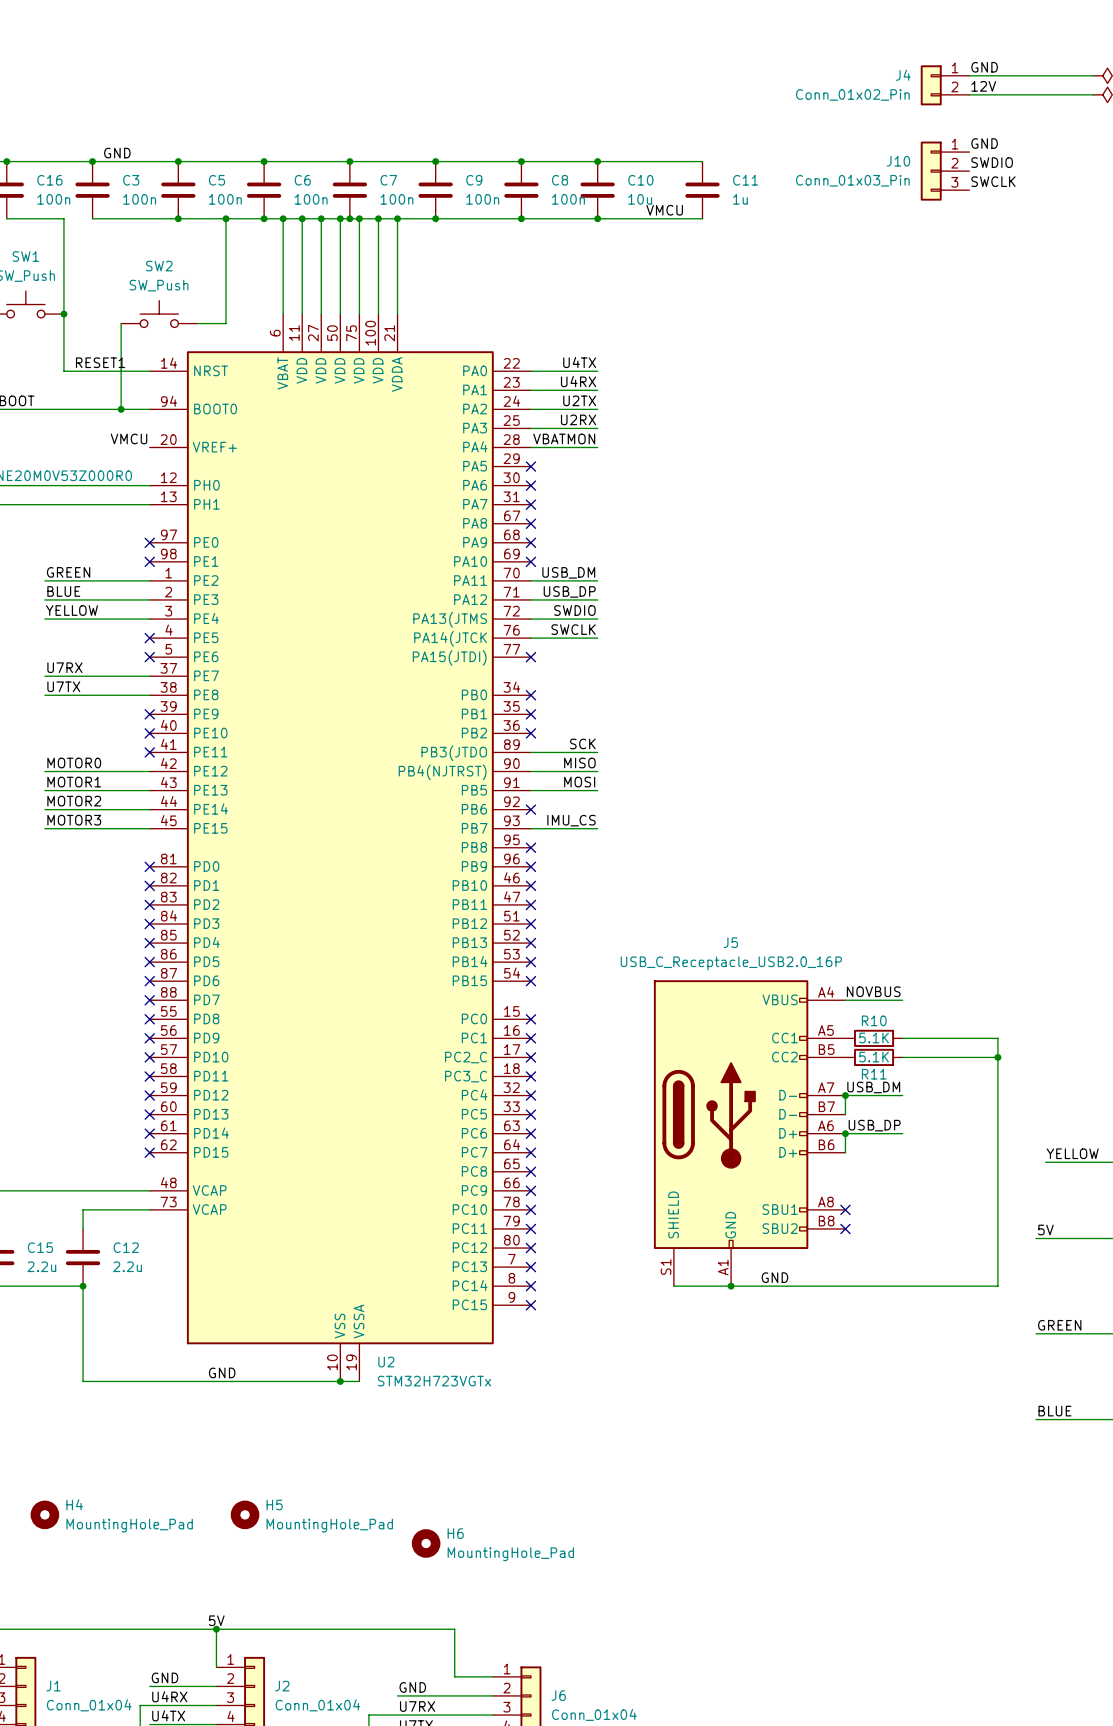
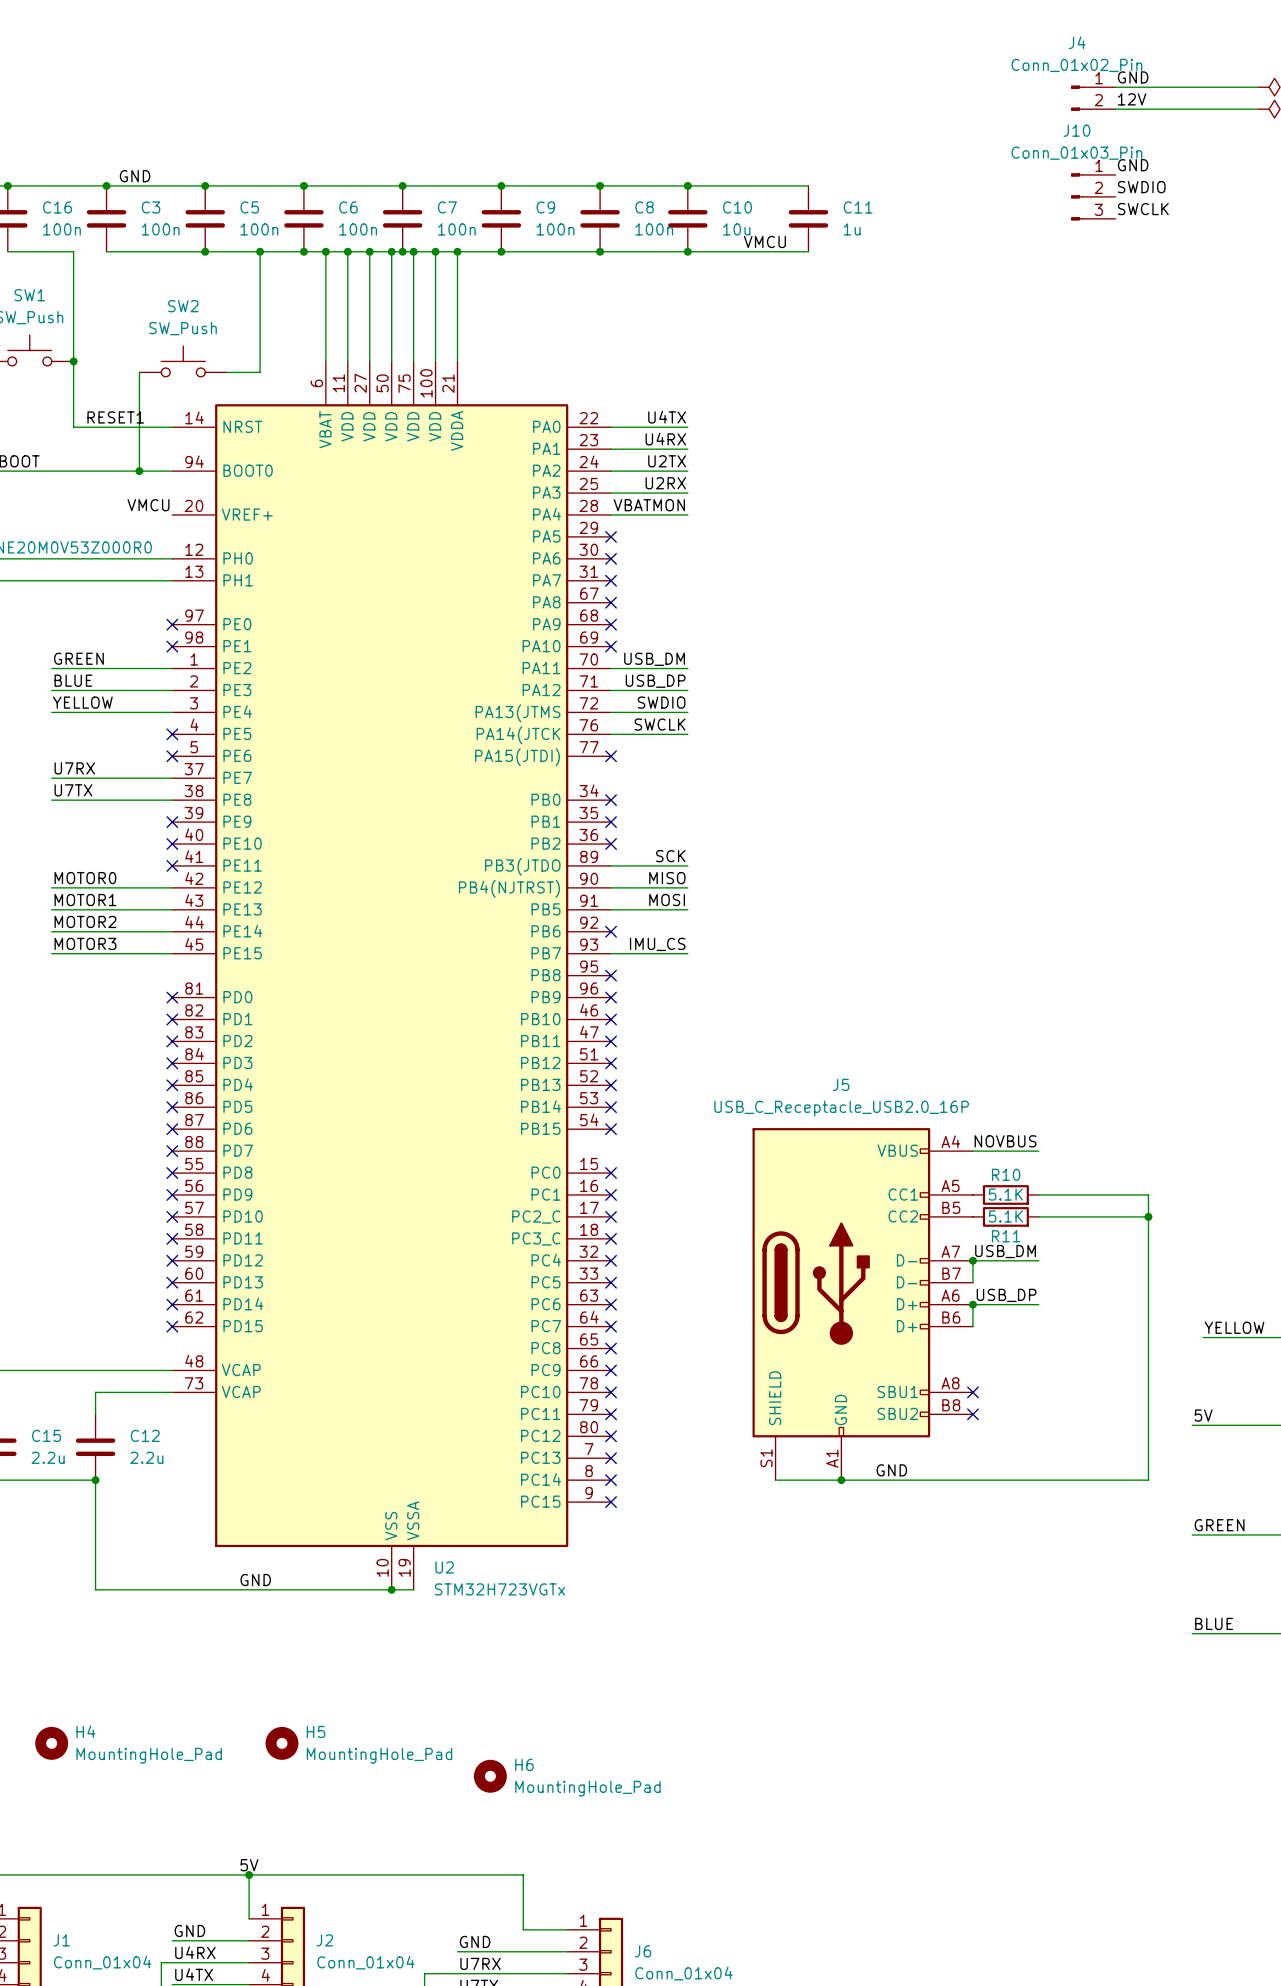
J4 symbol: [920, 65, 970, 106] -> [1071, 85, 1116, 111]
J4 name position: J4 (903, 75) -> J4 (1077, 42)
J4 value position: Conn_01x02_Pin (852, 94) -> Conn_01x02_Pin (1076, 65)
J10 symbol: [920, 141, 970, 201] -> [1071, 173, 1116, 221]
J10 name position: J10 (898, 161) -> J10 (1076, 130)
J10 value position: Conn_01x03_Pin (852, 180) -> Conn_01x03_Pin (1076, 153)

